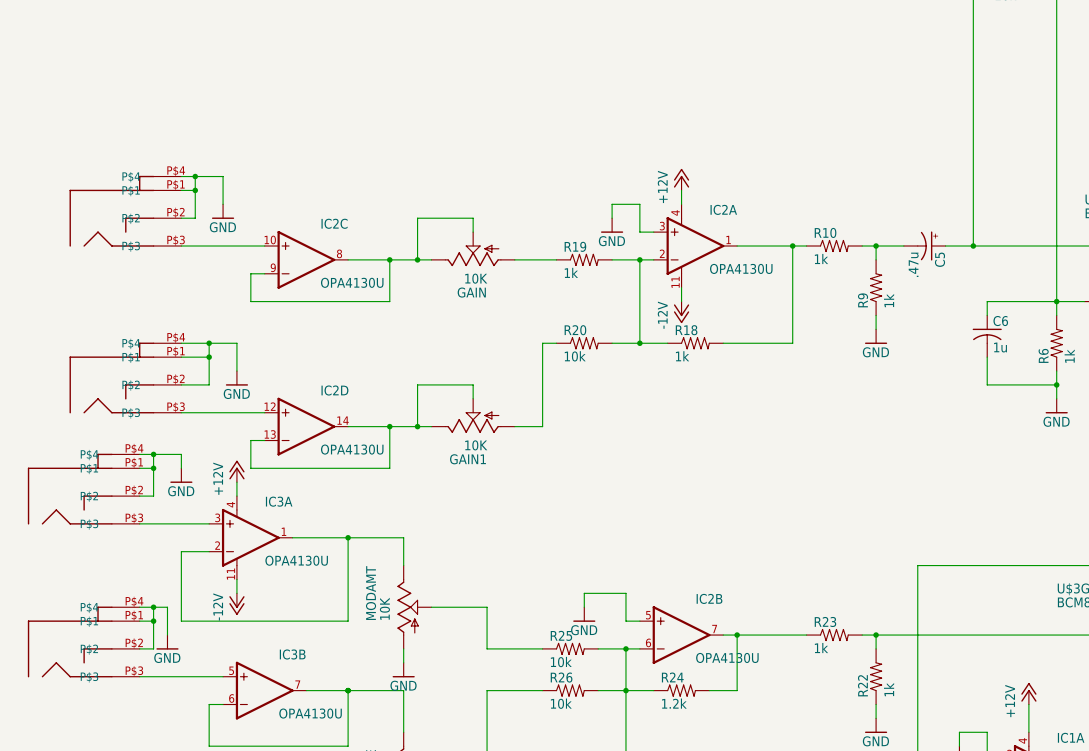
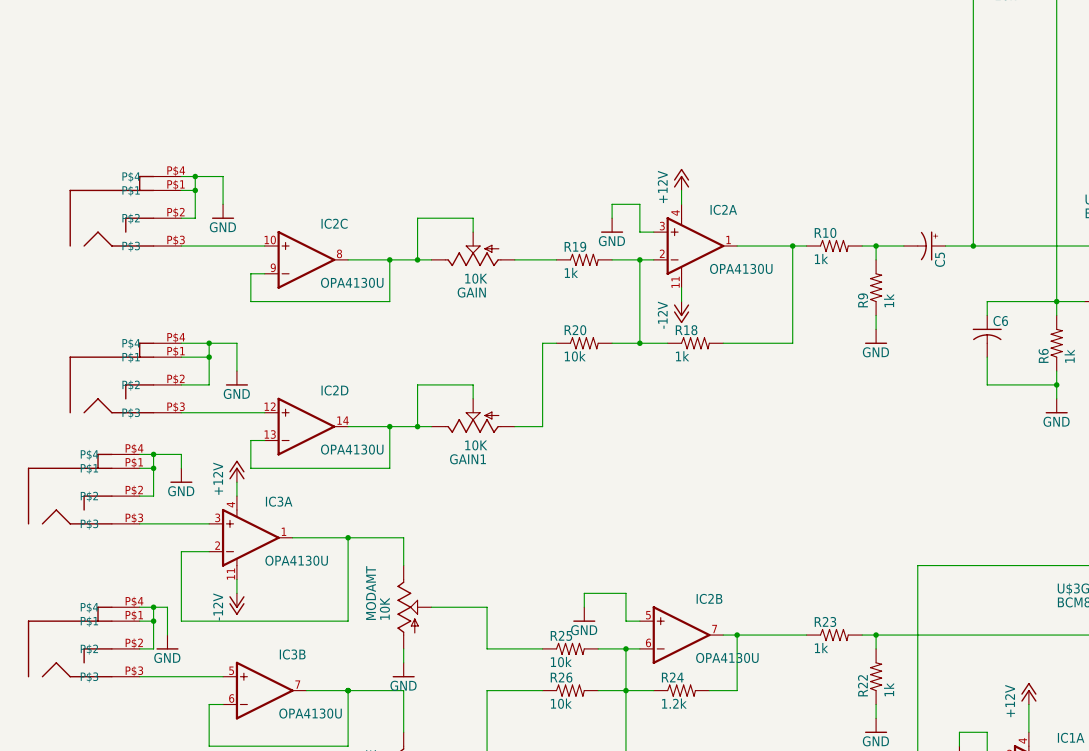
C5 value: .47u (913, 264) -> none
C6 value: 1u (1000, 347) -> none

